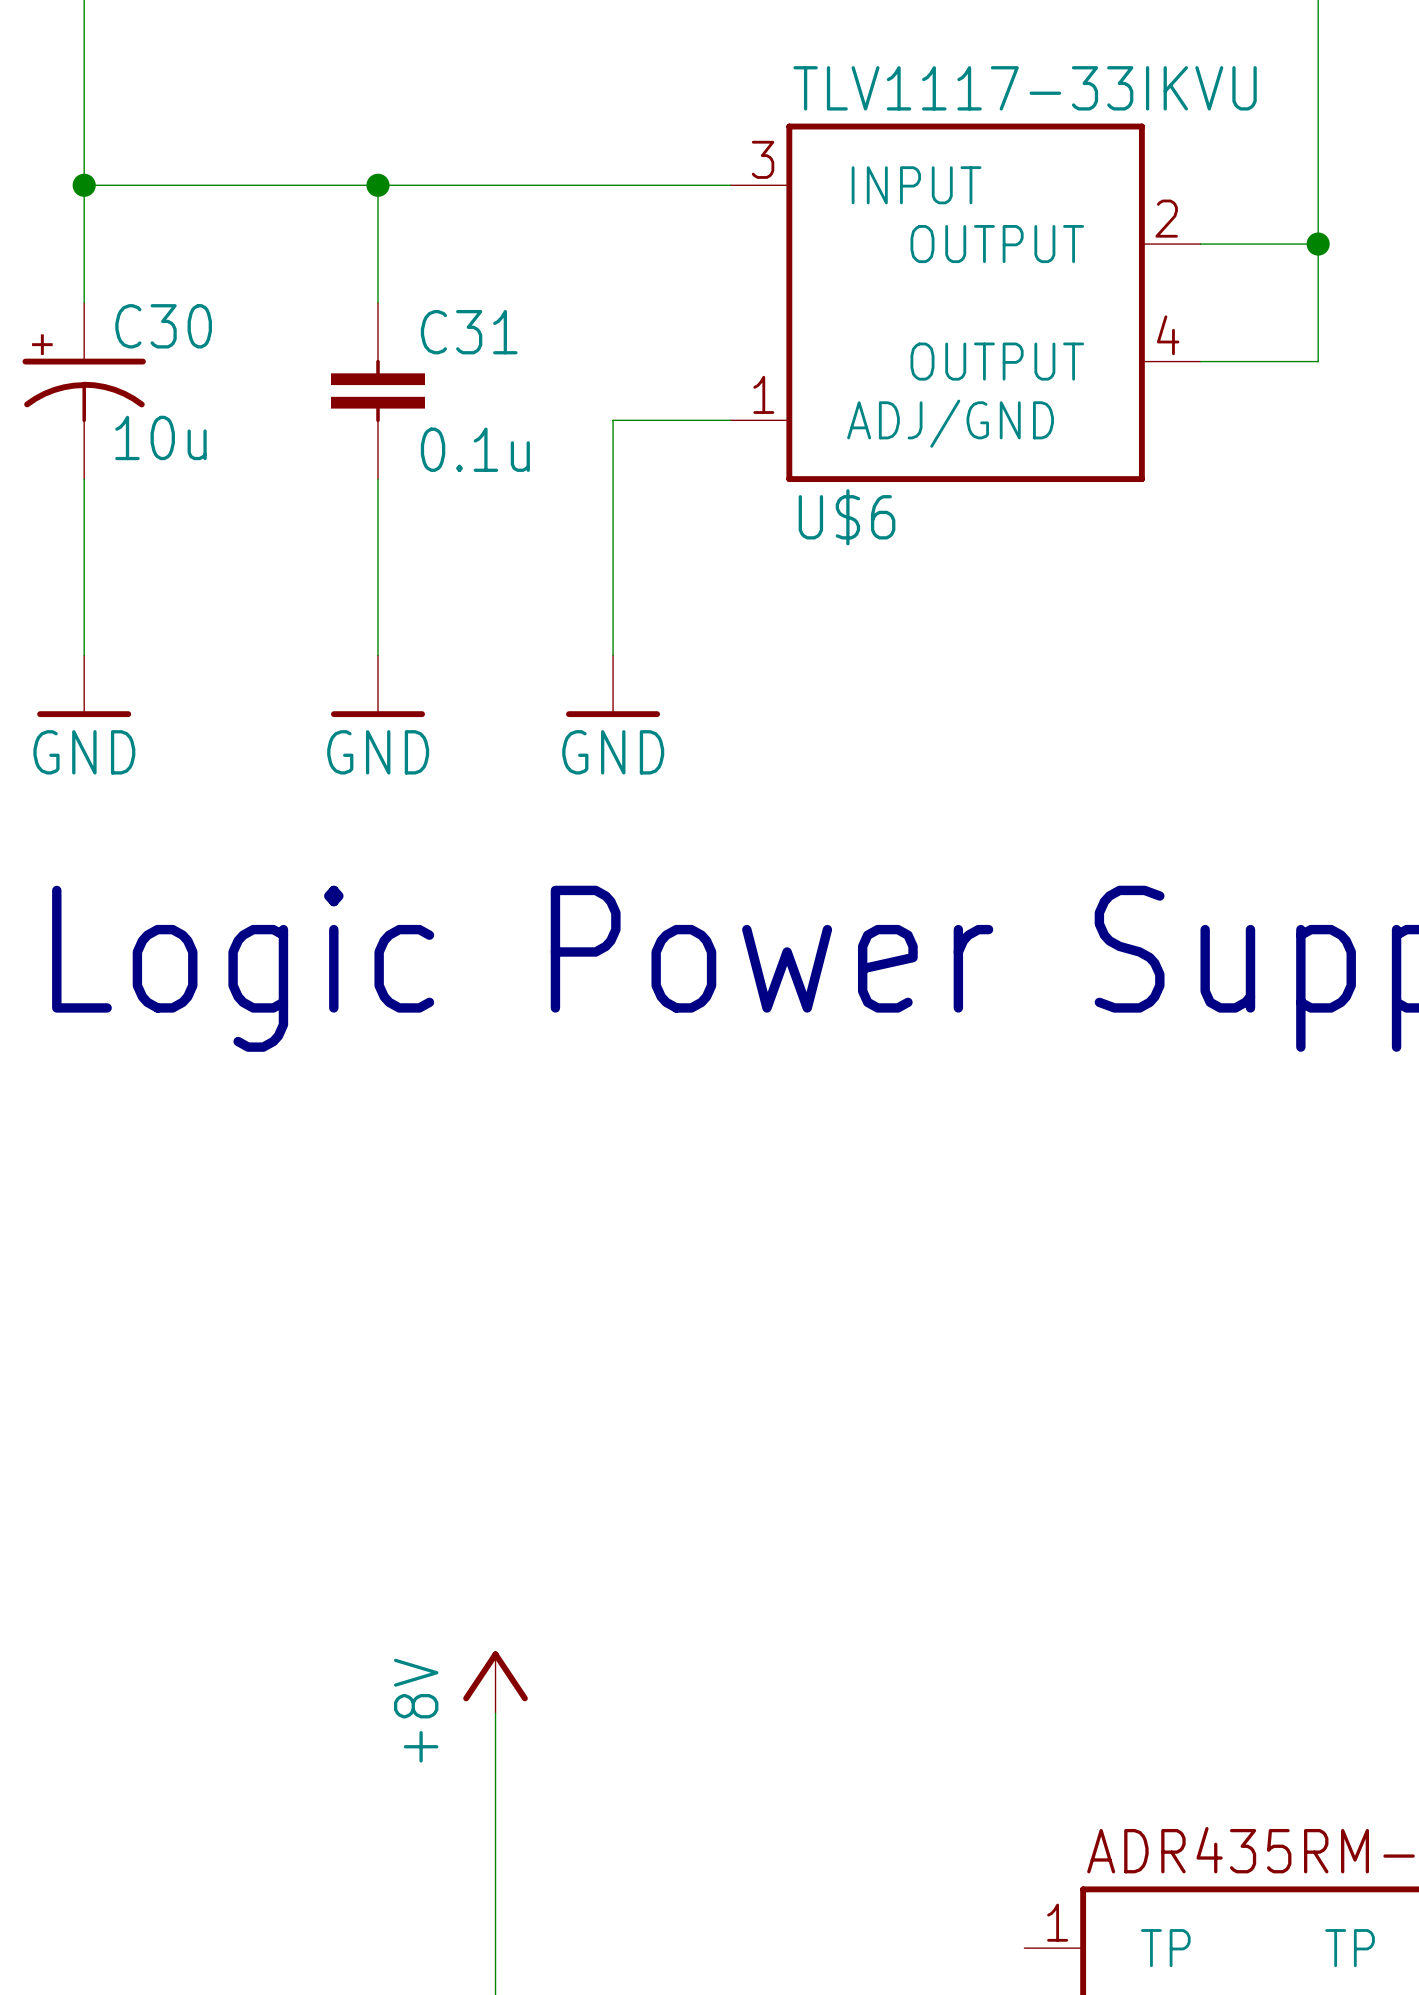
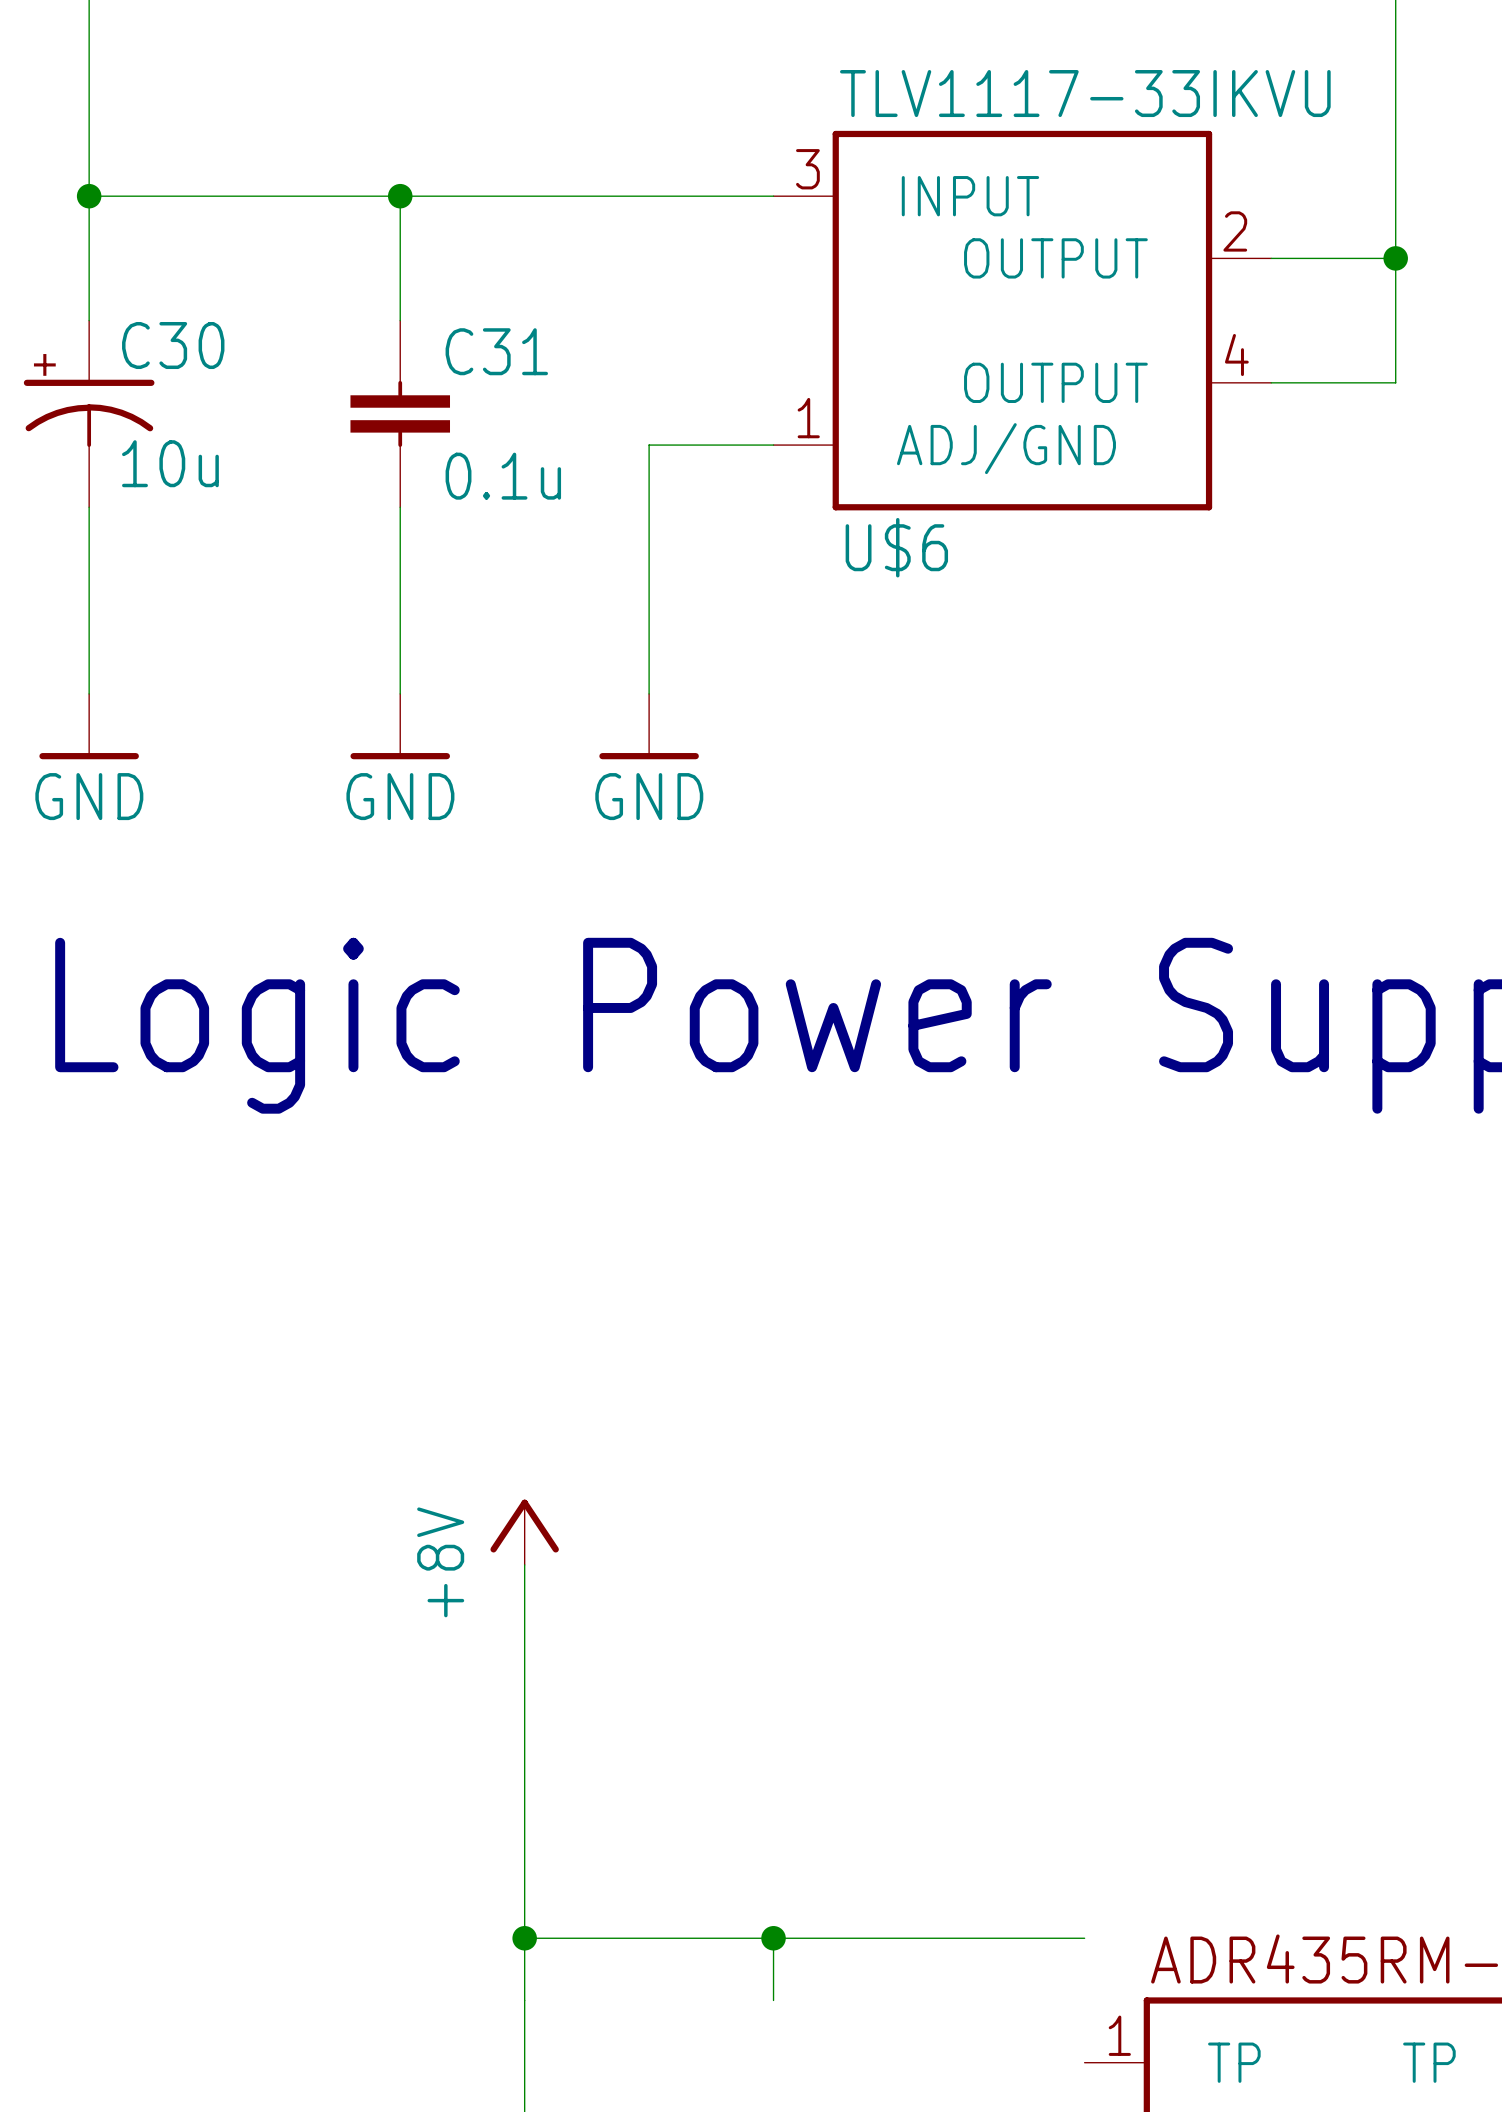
wire: none -> (524, 1564) (524, 1813)
power symbol position: +8V (495, 1682) -> +8V (524, 1532)
wire: none -> (524, 1938) (1084, 1938)
junction: none -> (524, 1938)
wire: none -> (773, 1938) (773, 2000)
junction: none -> (773, 1938)

